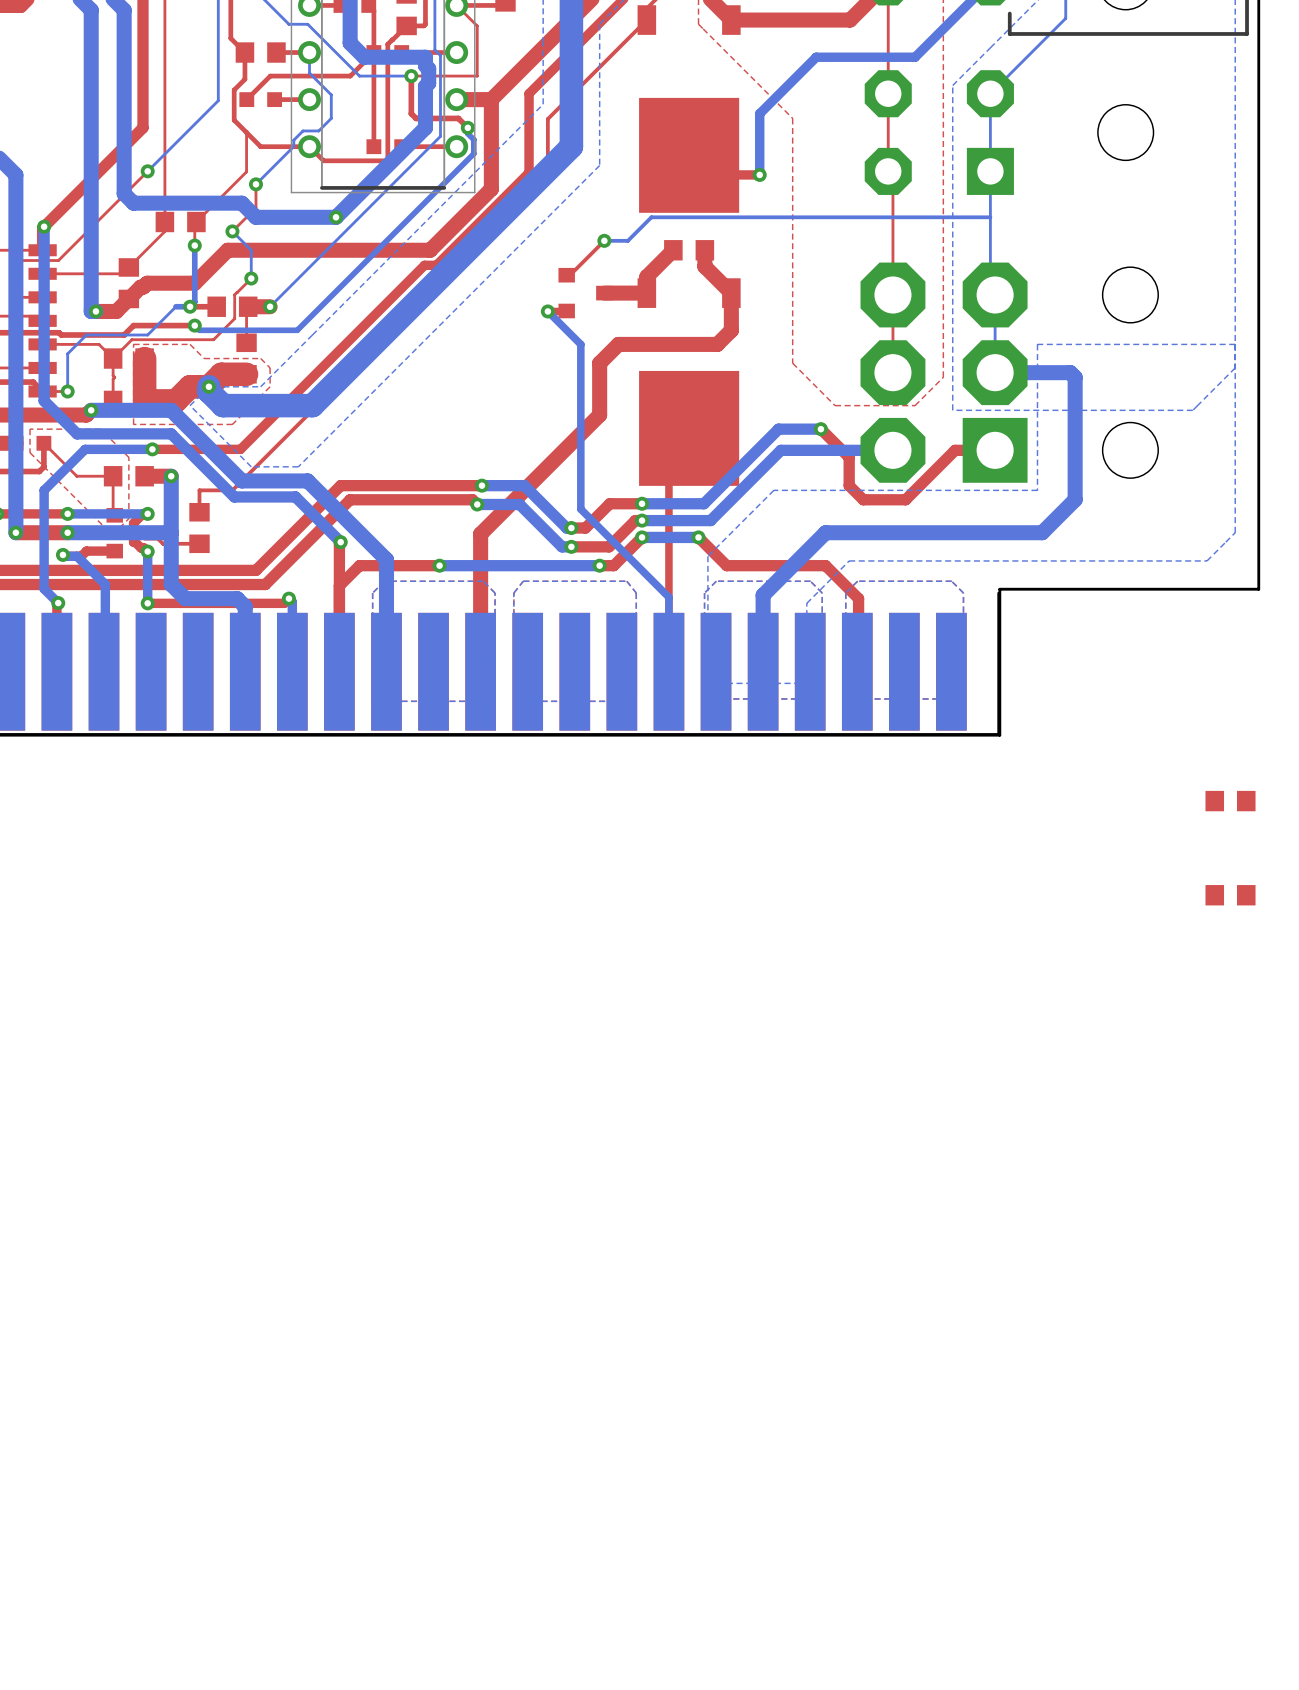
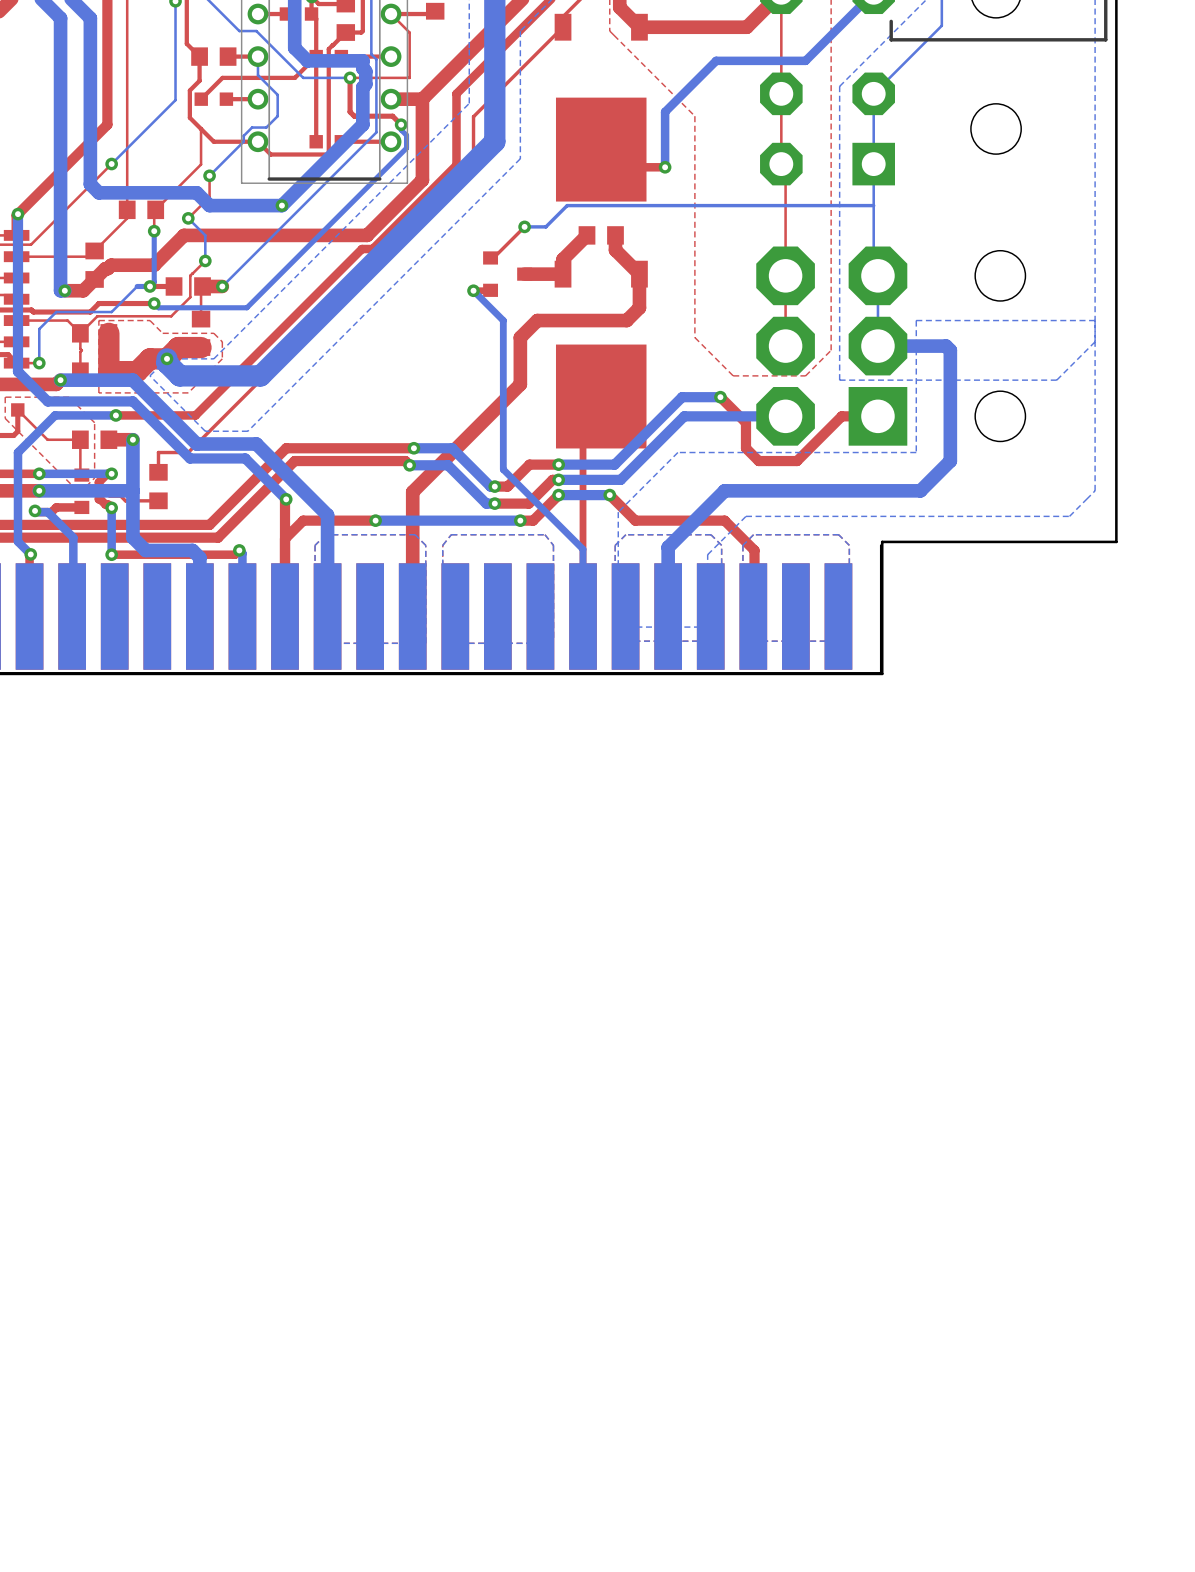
part: (1230, 801) -> none
part: (1230, 895) -> none

